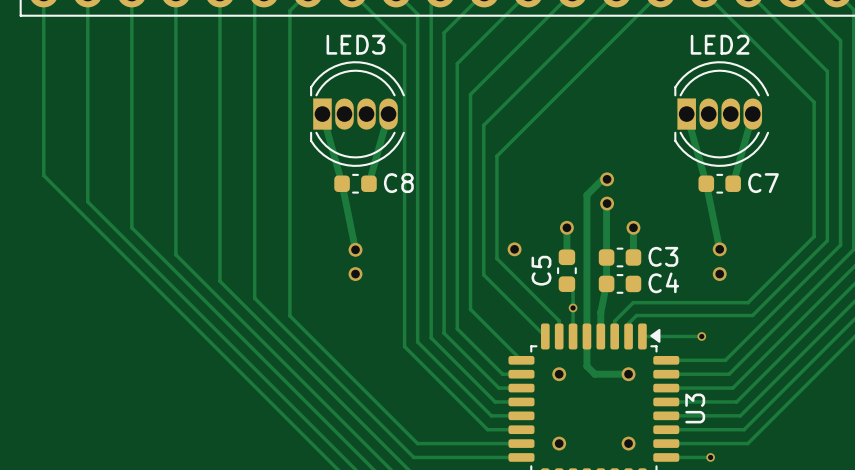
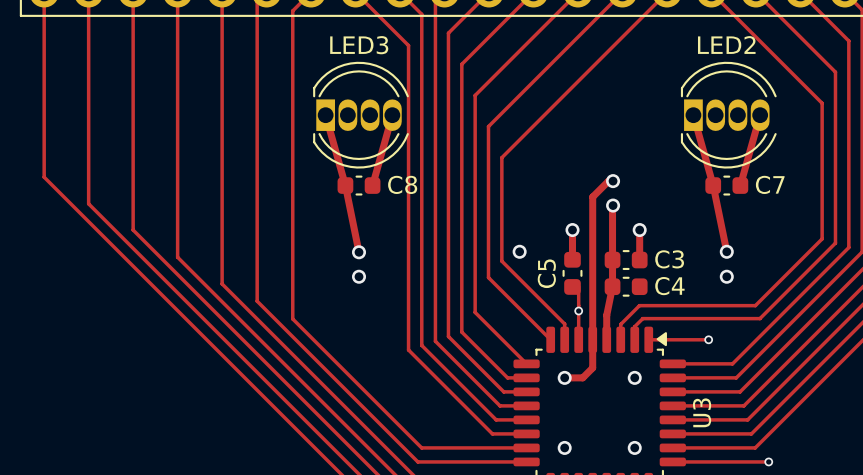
track: (586, 364) (594, 374) (628, 374) -> (592, 367) (582, 377) (564, 377)
track: none -> (717, 461) (768, 461)
via position: (710, 457) -> (768, 461)

